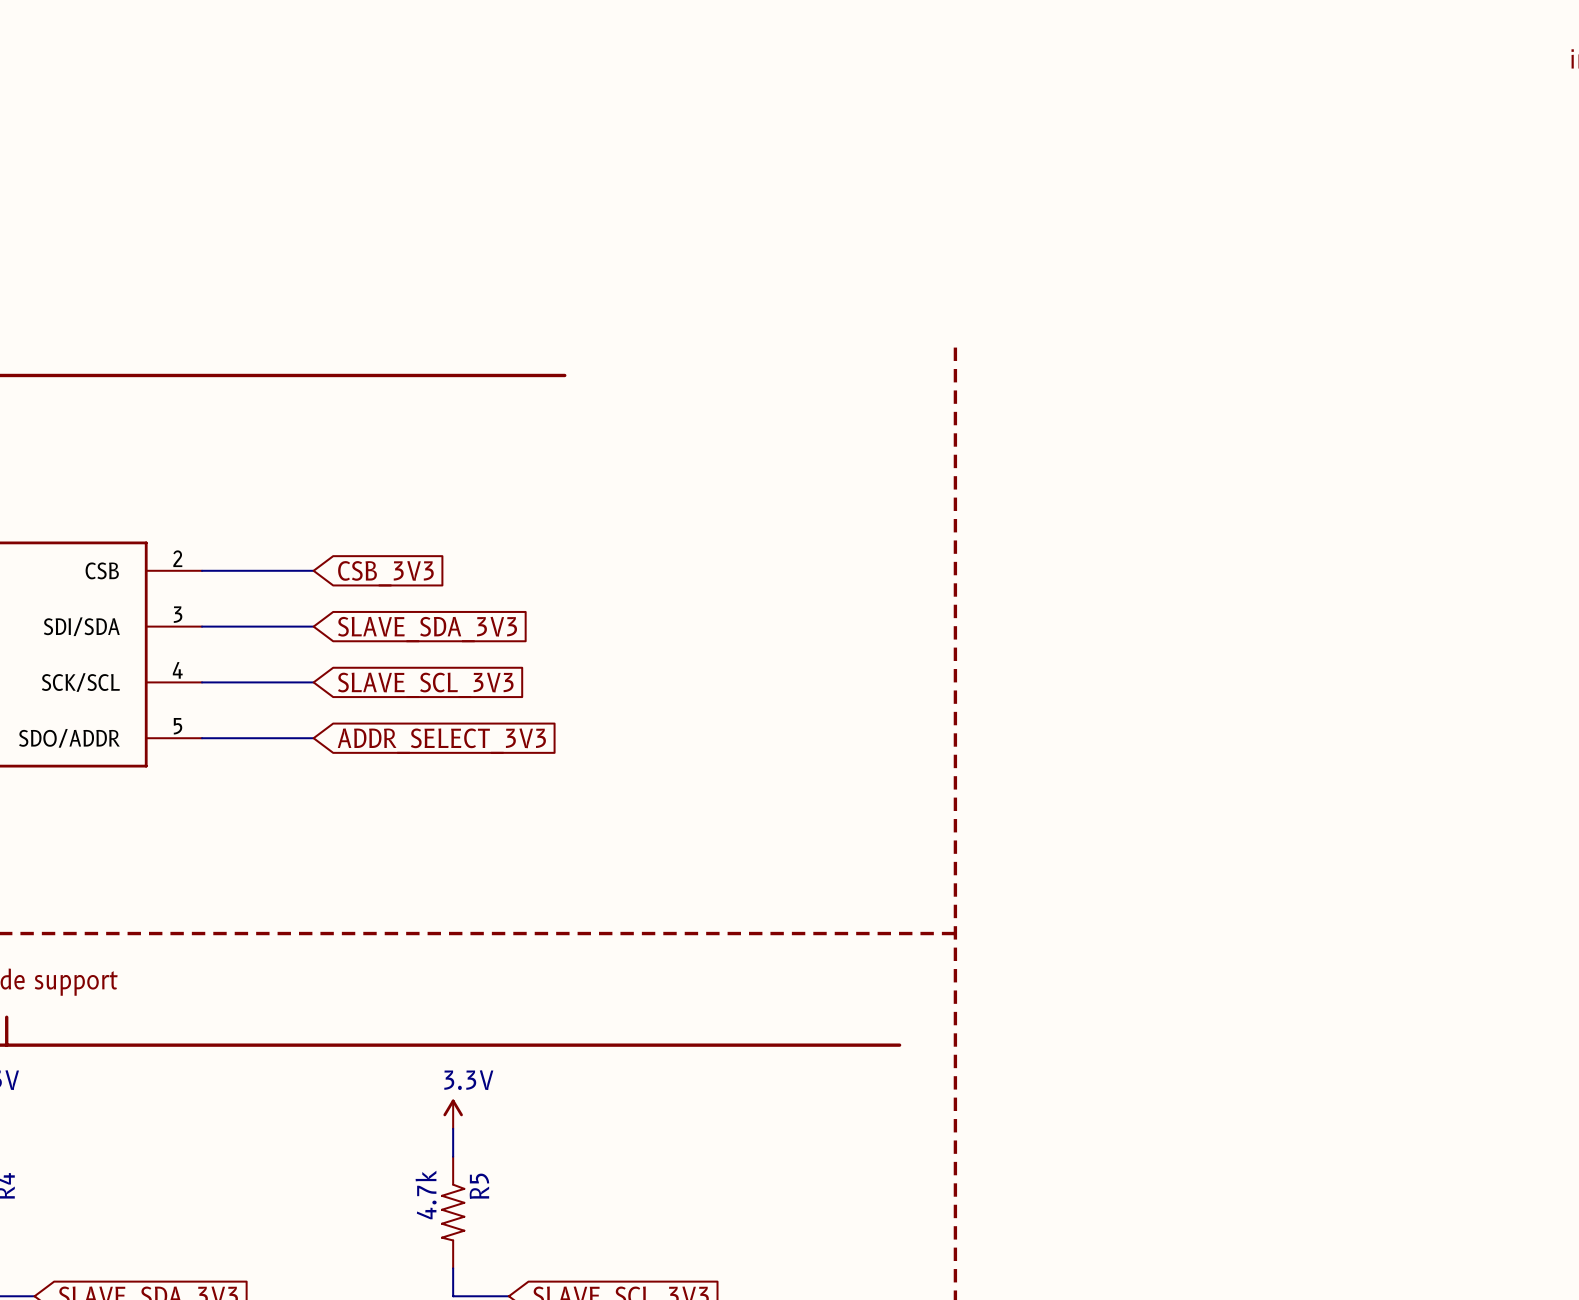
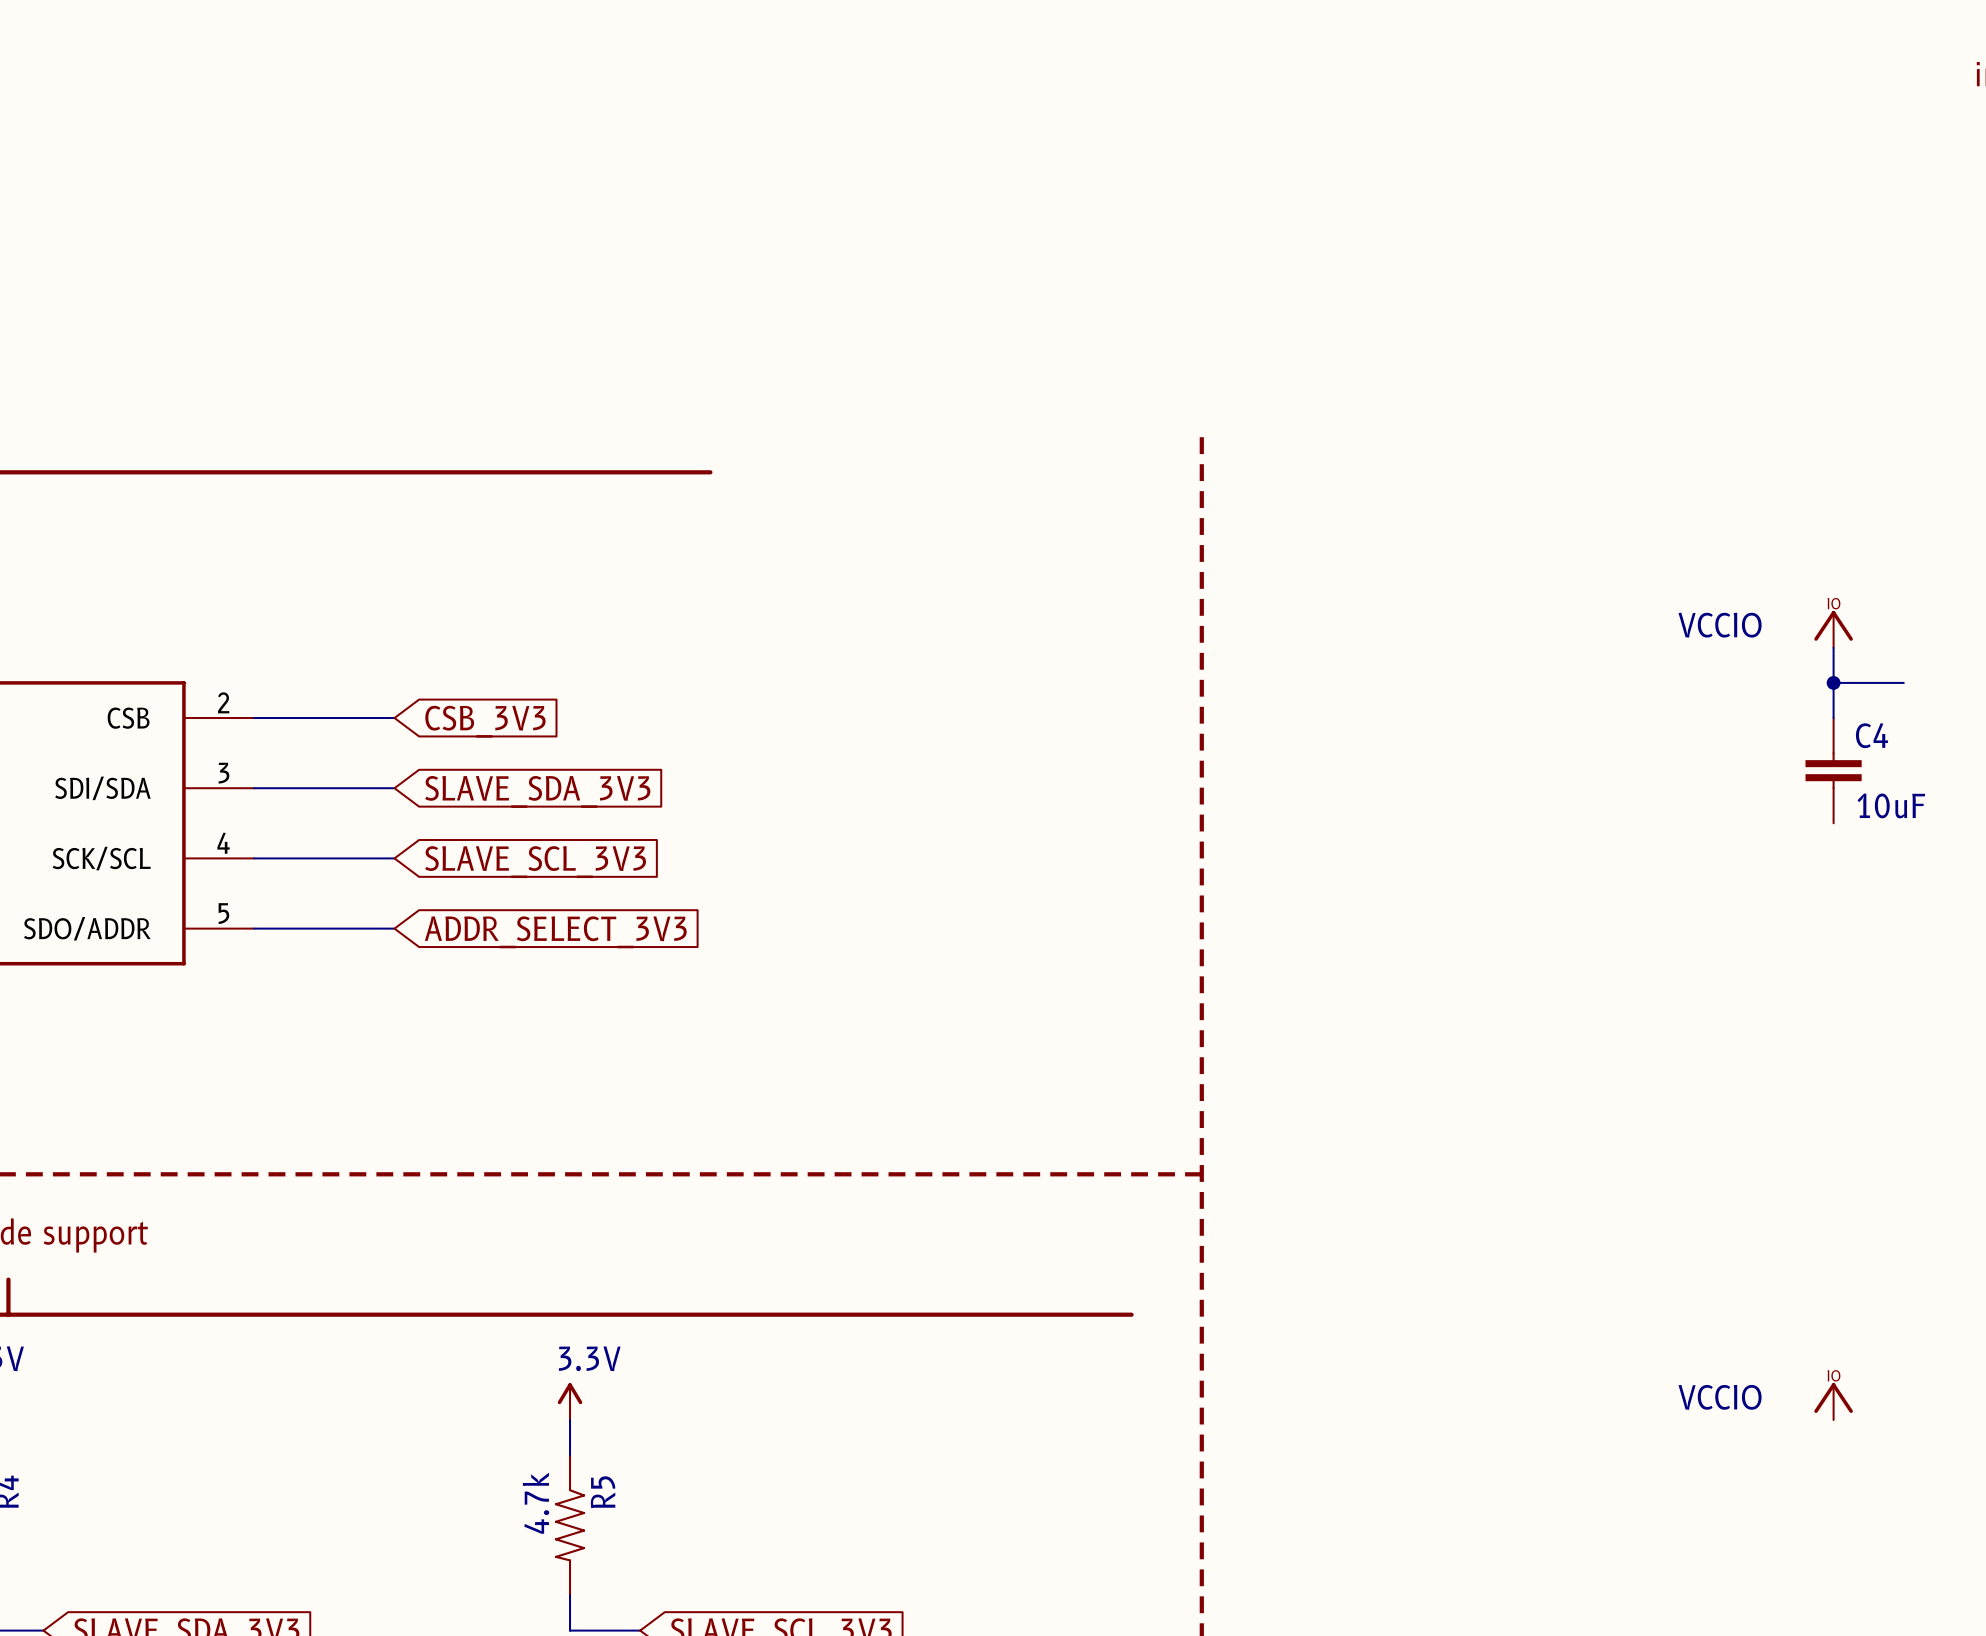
power symbol: none -> VCCIO (1833, 629)
wire: none -> (1833, 647) (1833, 718)
wire: none -> (1833, 682) (1903, 682)
junction: none -> (1833, 682)
C4: none -> 10uF (1833, 770)
power symbol: none -> VCCIO (1833, 1401)

